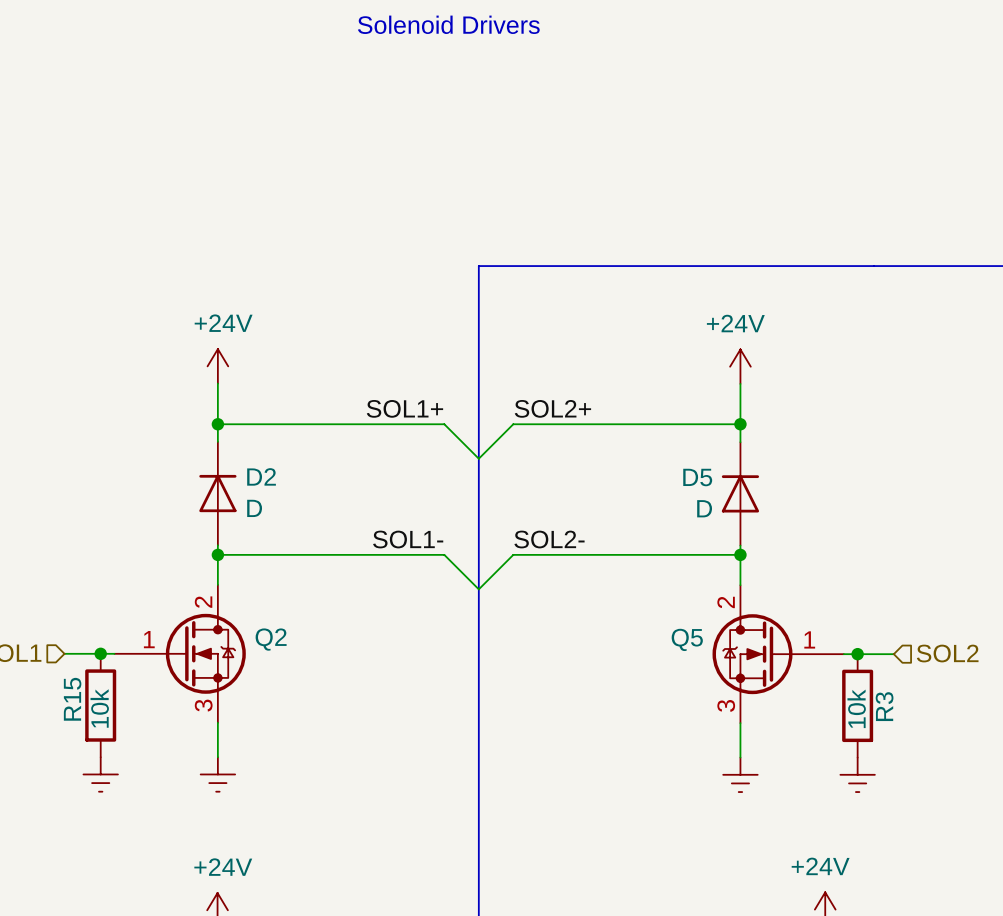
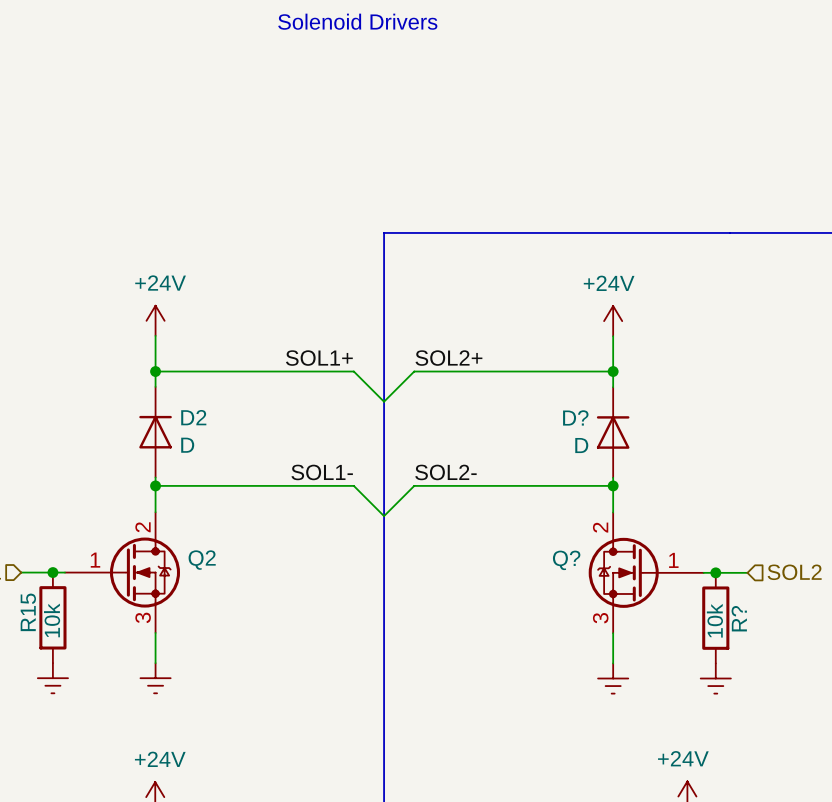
D5 name: D5 (697, 477) -> D? (575, 417)
Q5 name: Q5 (687, 639) -> Q? (566, 560)
R3 name: R3 (884, 706) -> R? (739, 618)

